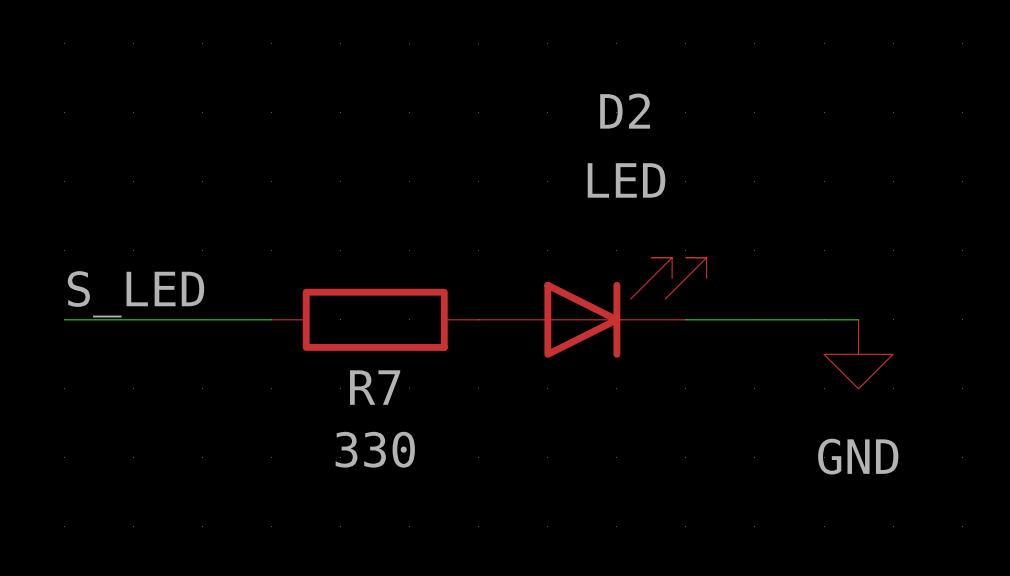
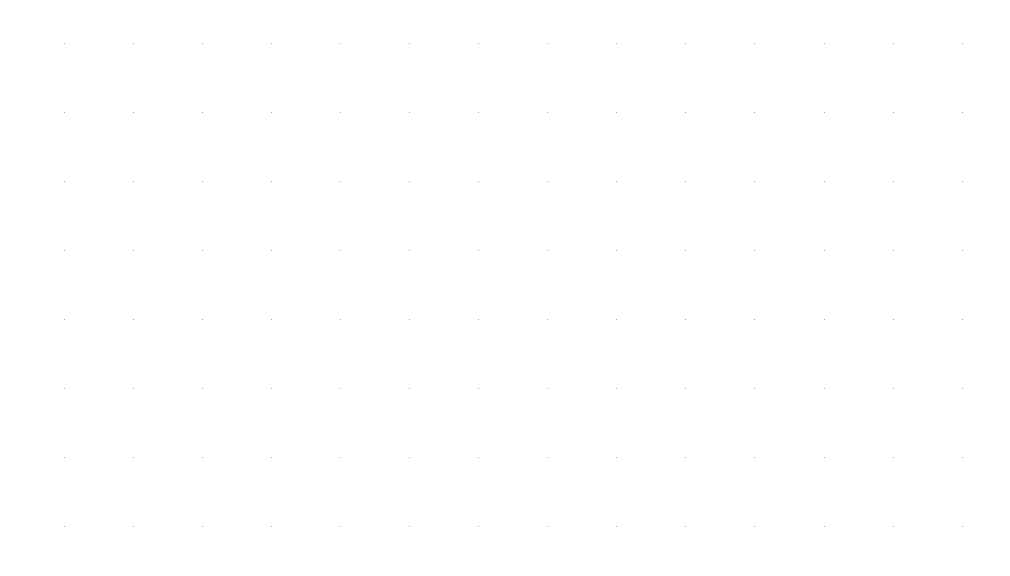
label: S_LED (135, 294) -> none
D2: LED (592, 307) -> none
wire: (64, 319) (271, 319) -> none
R7: 330 (375, 319) -> none
wire: (685, 319) (858, 319) -> none
power symbol: GND (858, 354) -> none

